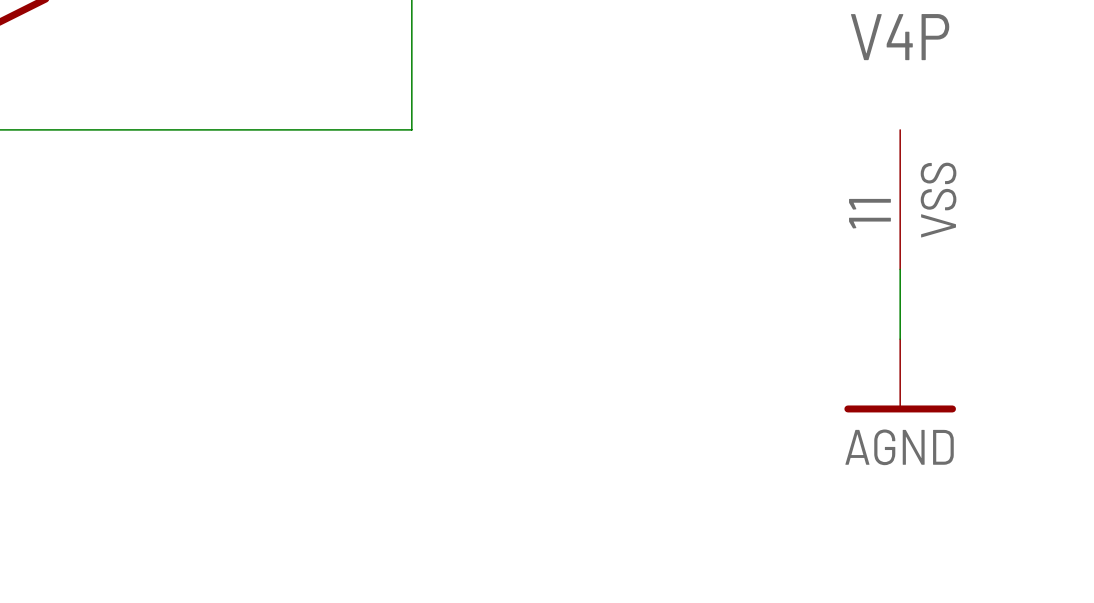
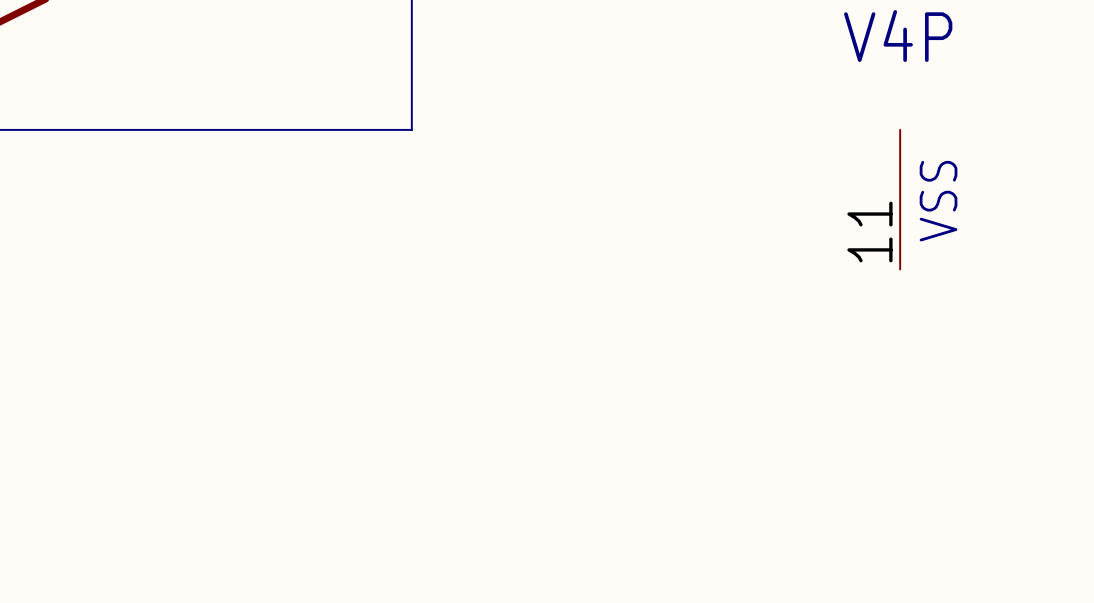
wire: (900, 269) (900, 339) -> none
power symbol: AGND (900, 375) -> none

